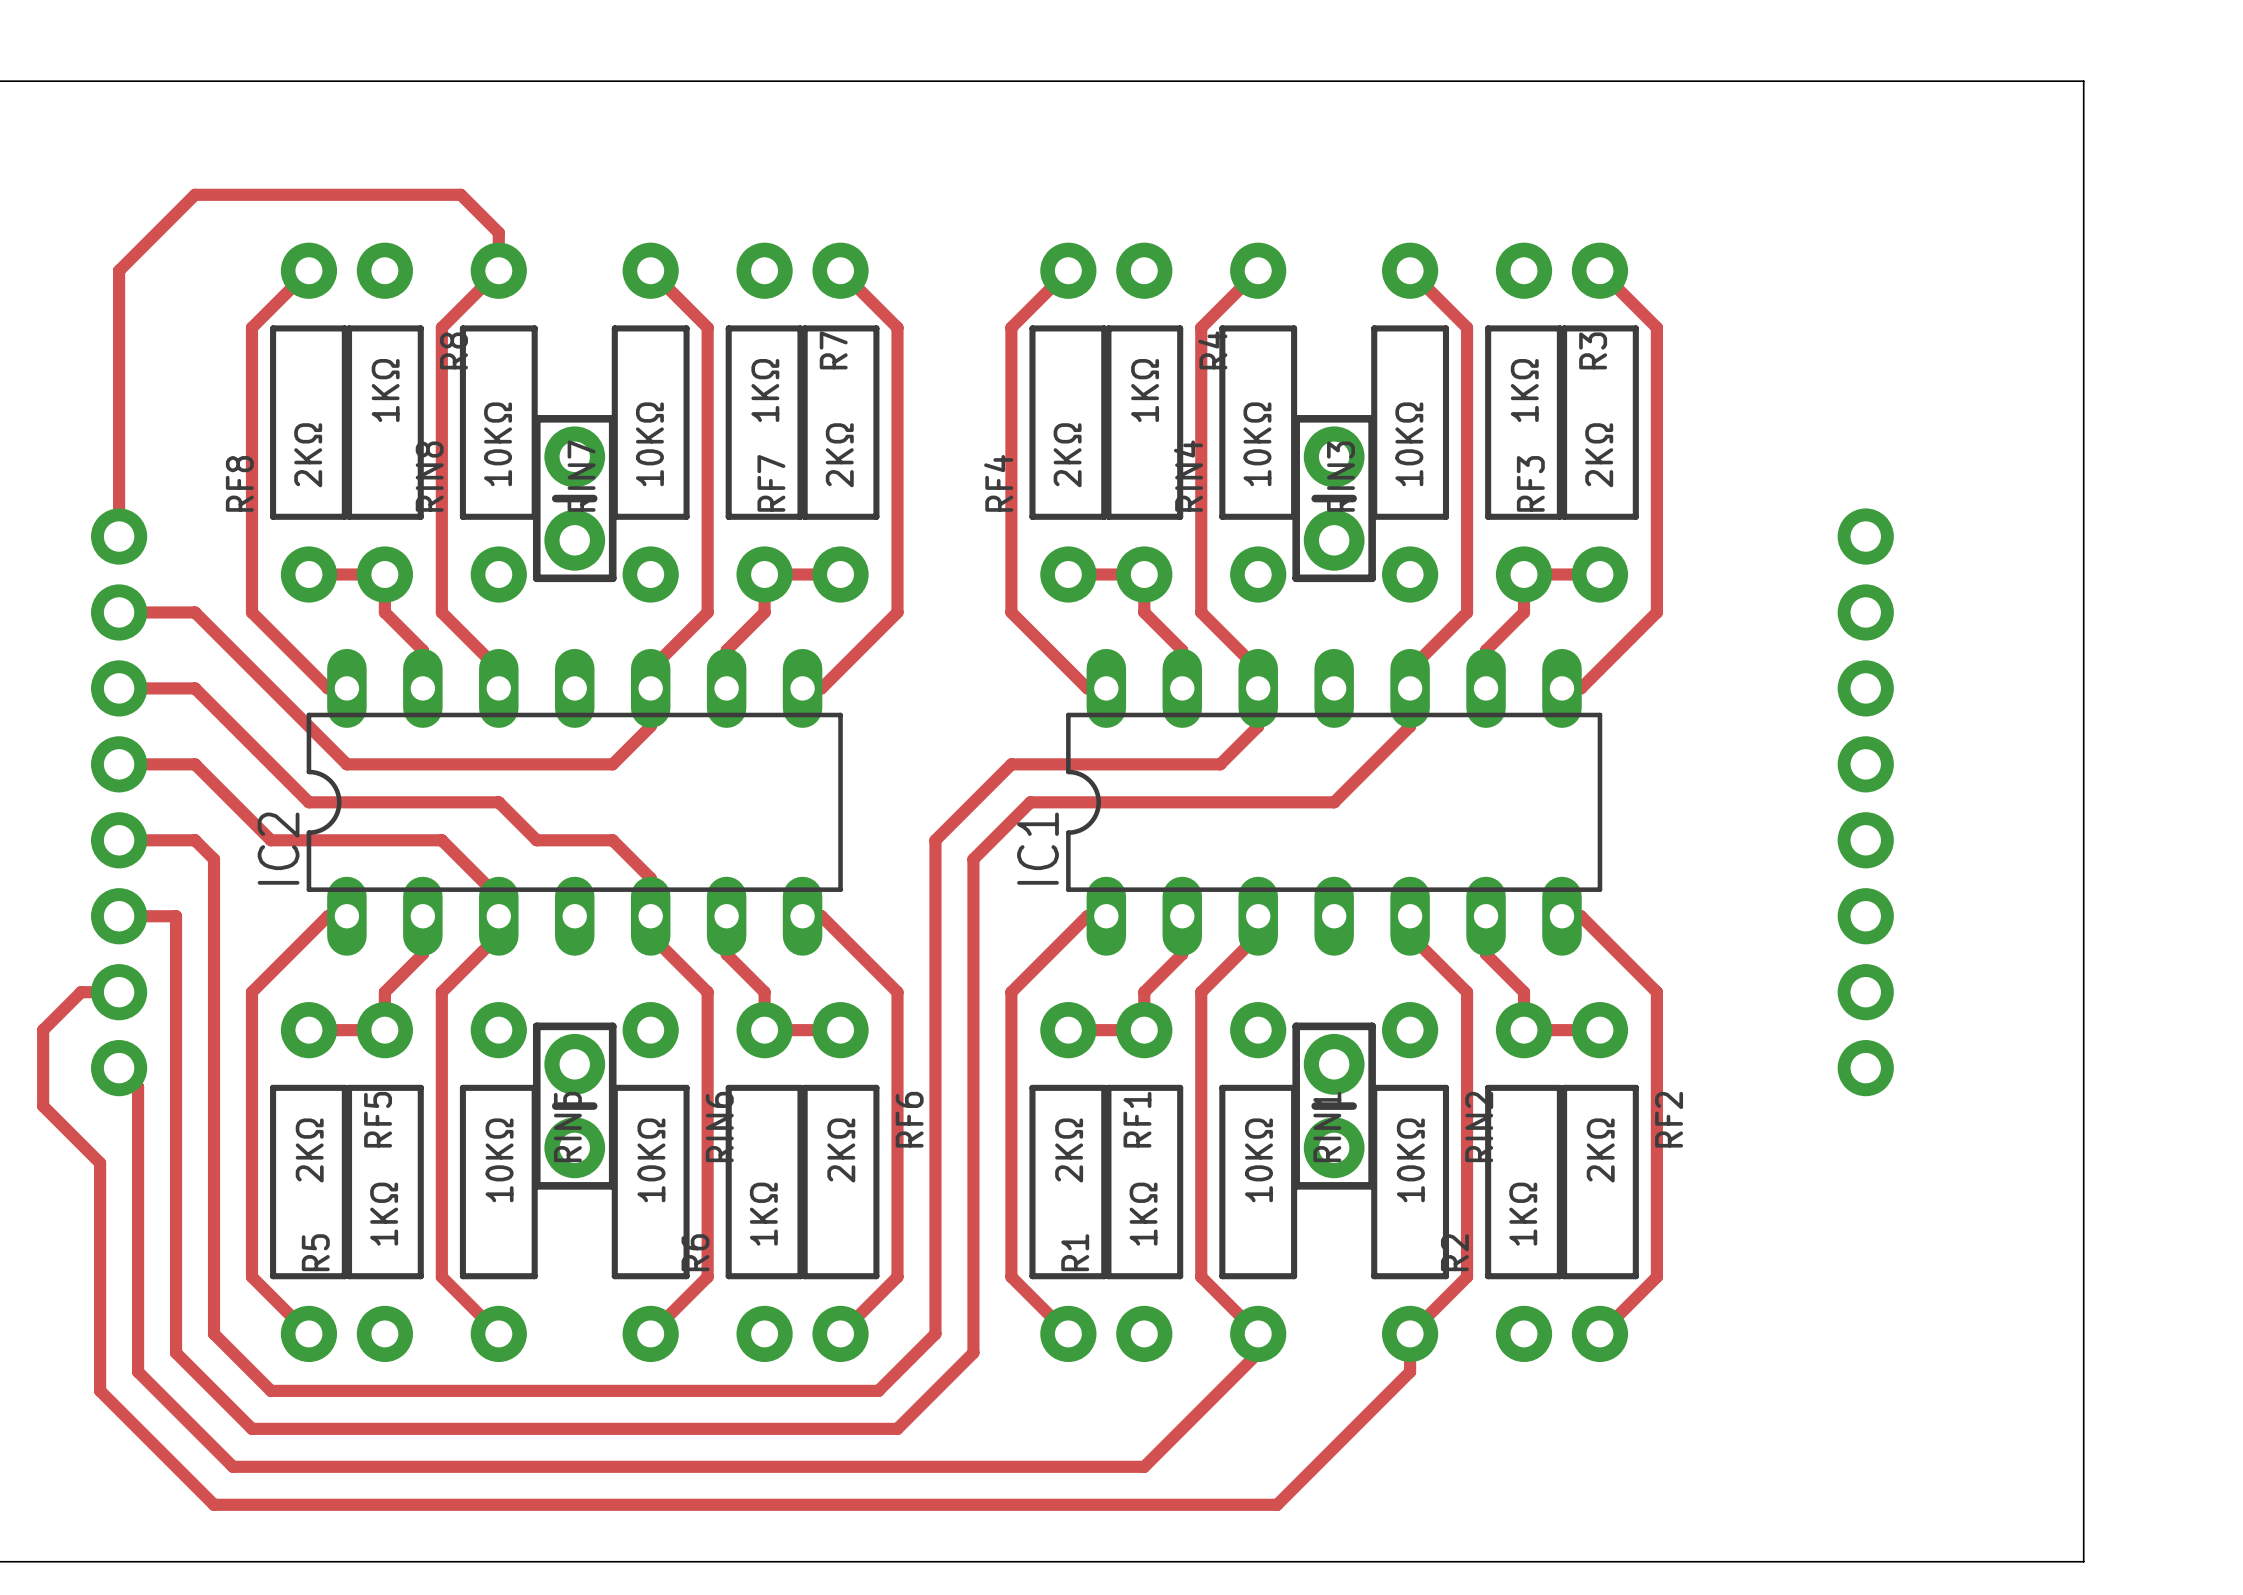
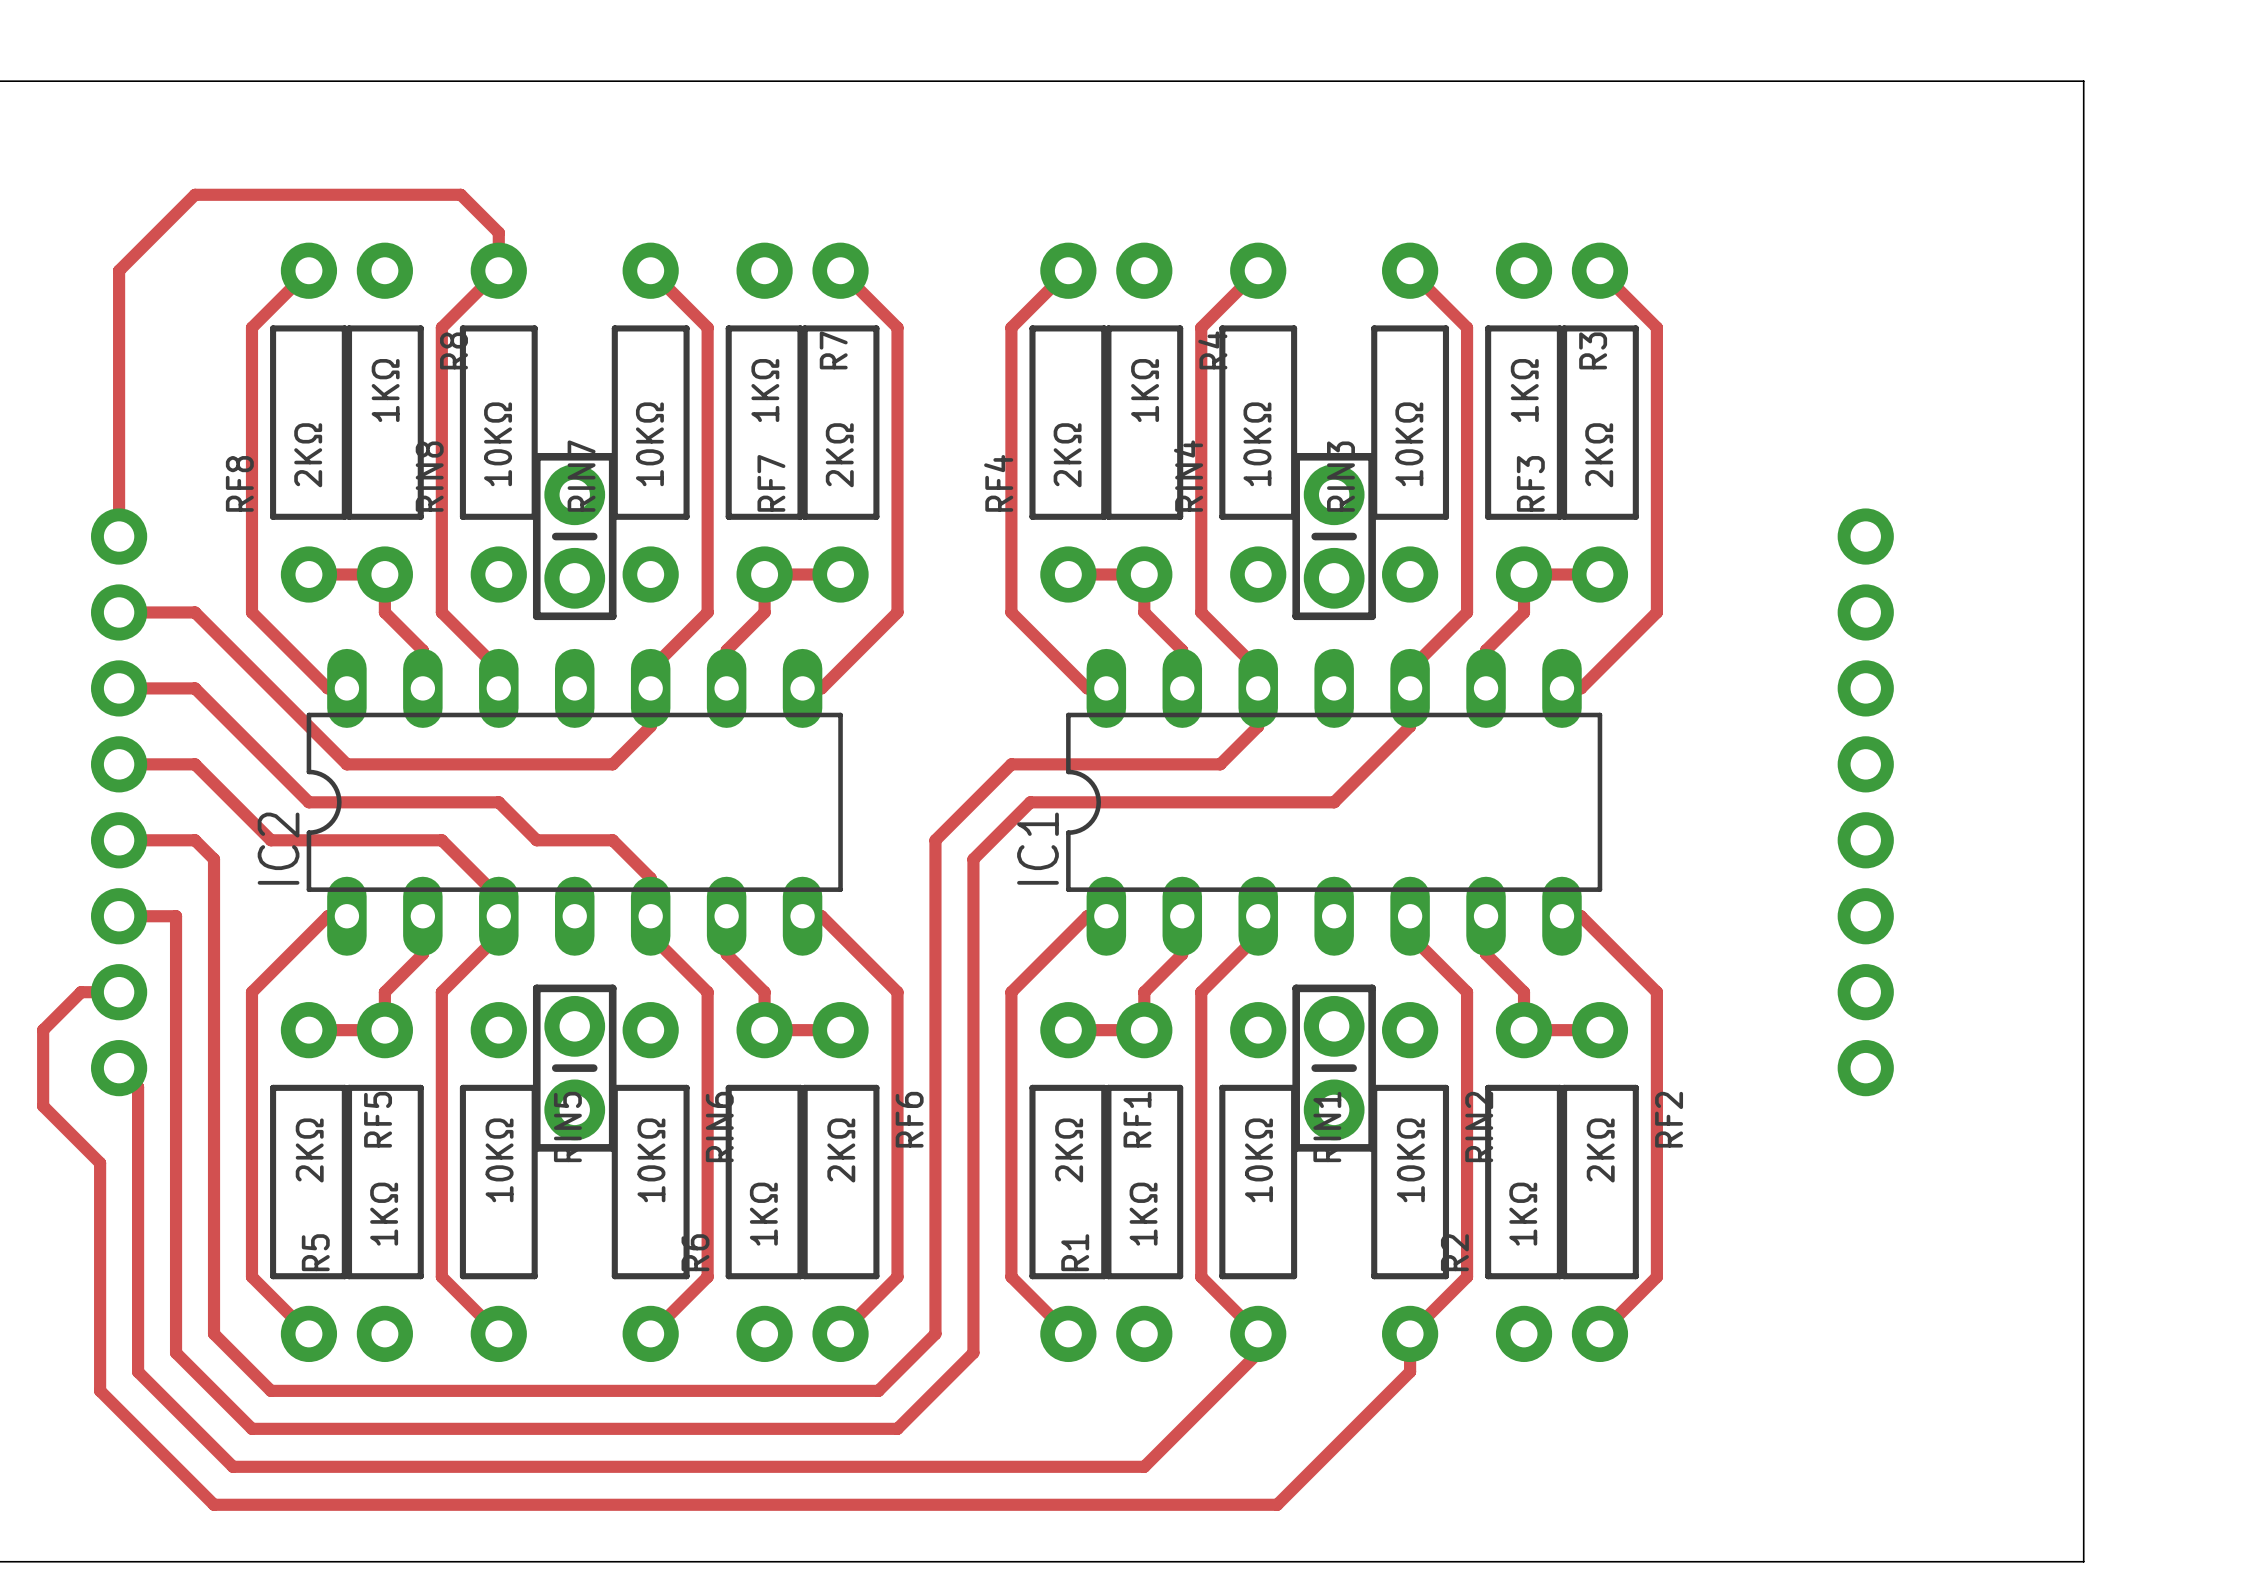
part position: (574, 498) -> (574, 536)
part position: (1334, 498) -> (1334, 536)
part position: (574, 1106) -> (574, 1068)
part position: (1334, 1106) -> (1334, 1068)

